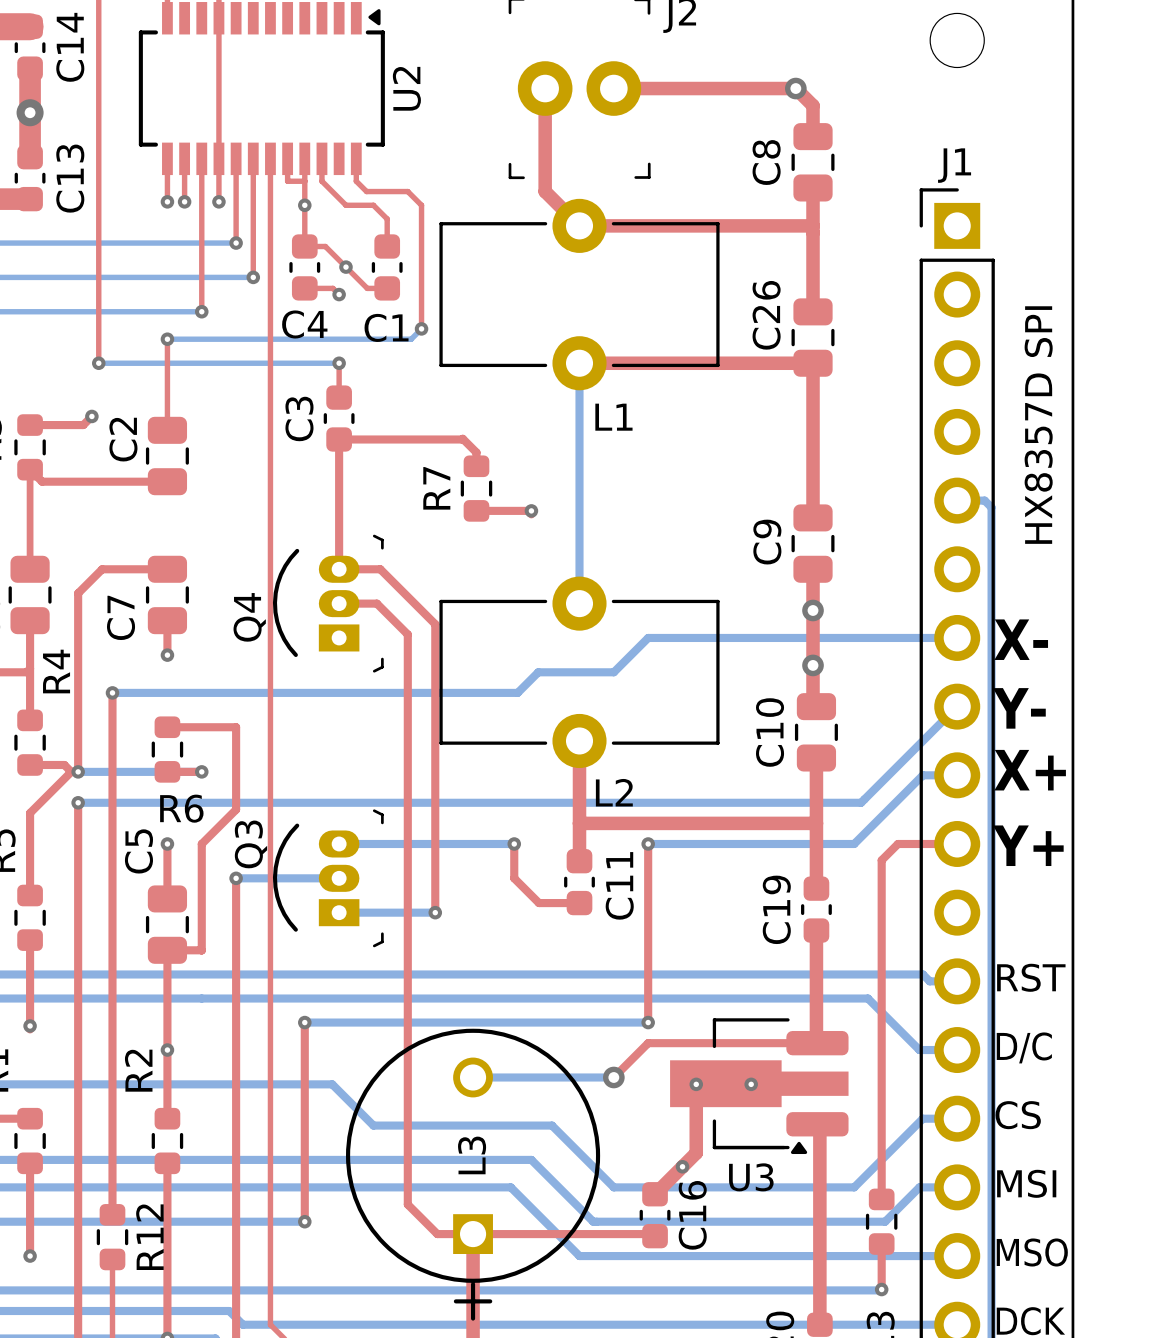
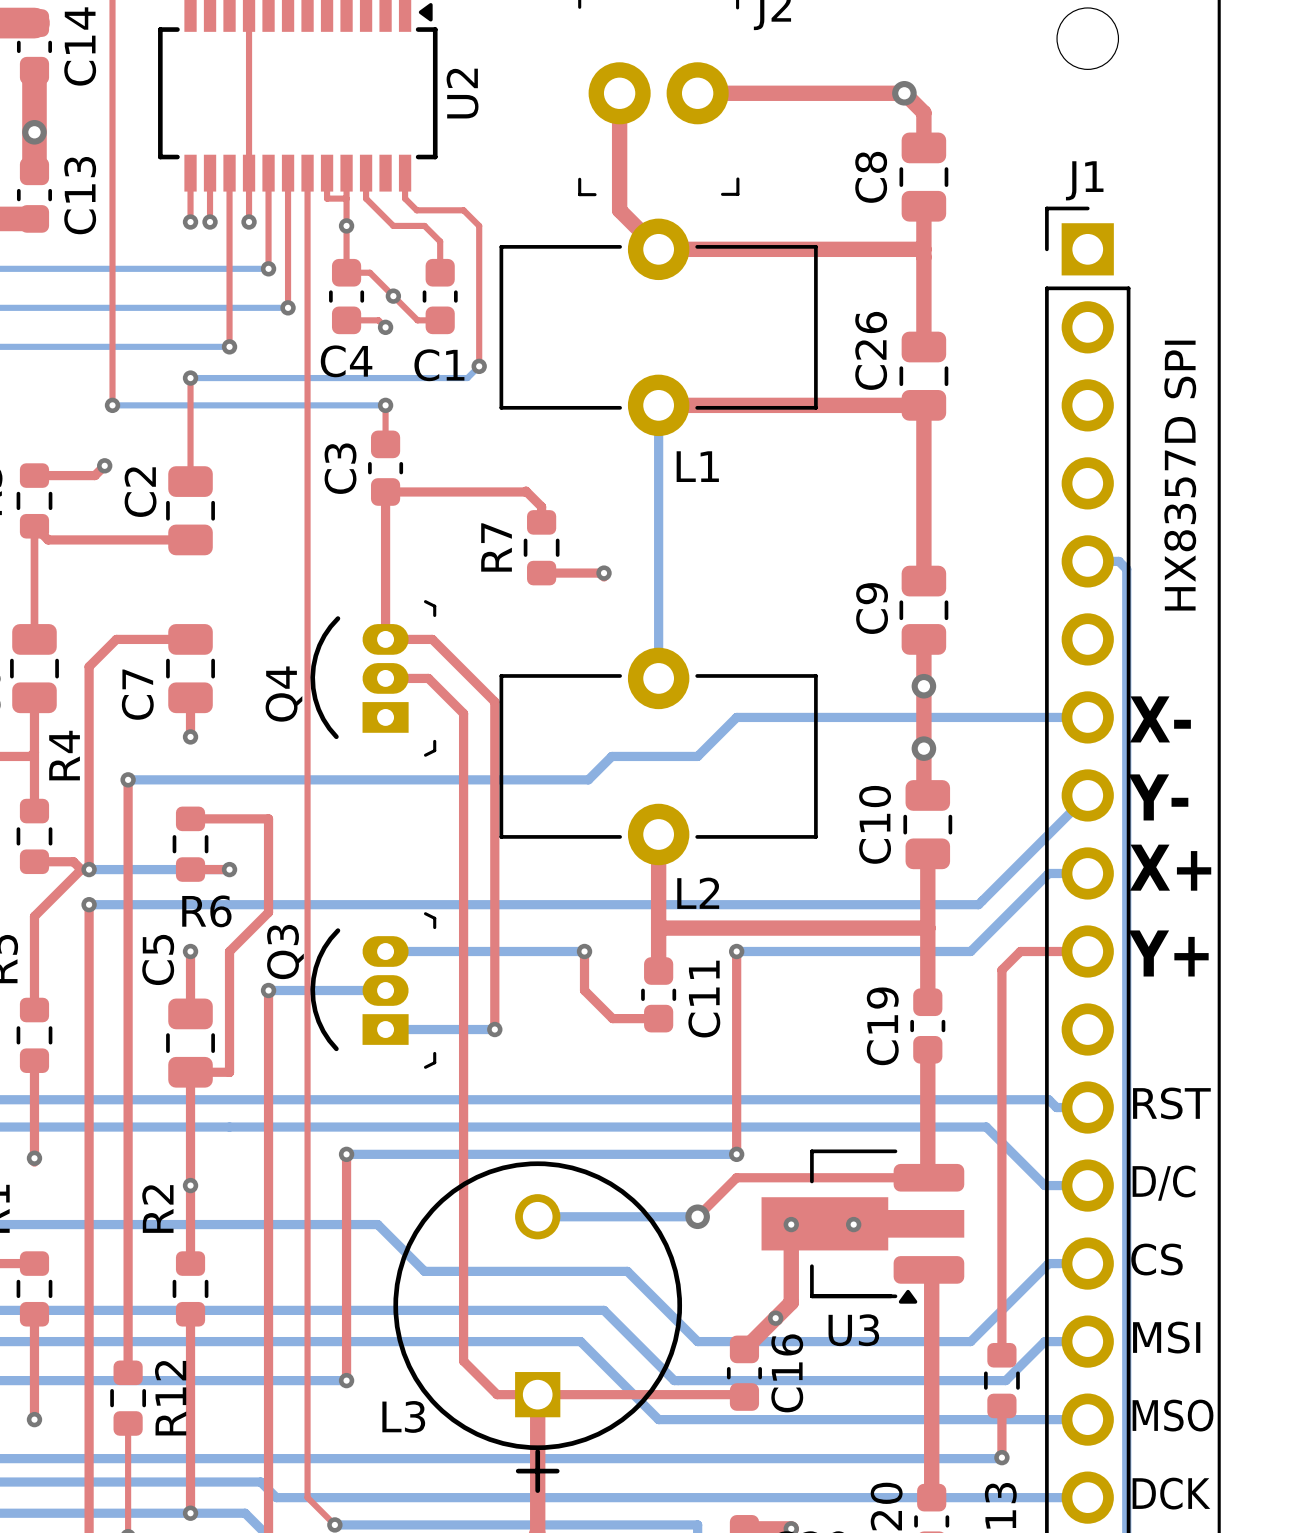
via size: [16, 99, 44, 127] -> [22, 120, 47, 145]
L3 name rotation: 0° (472, 1155) -> 90° clockwise (403, 1416)
L3 name position: L3 (472, 1155) -> L3 (403, 1416)

